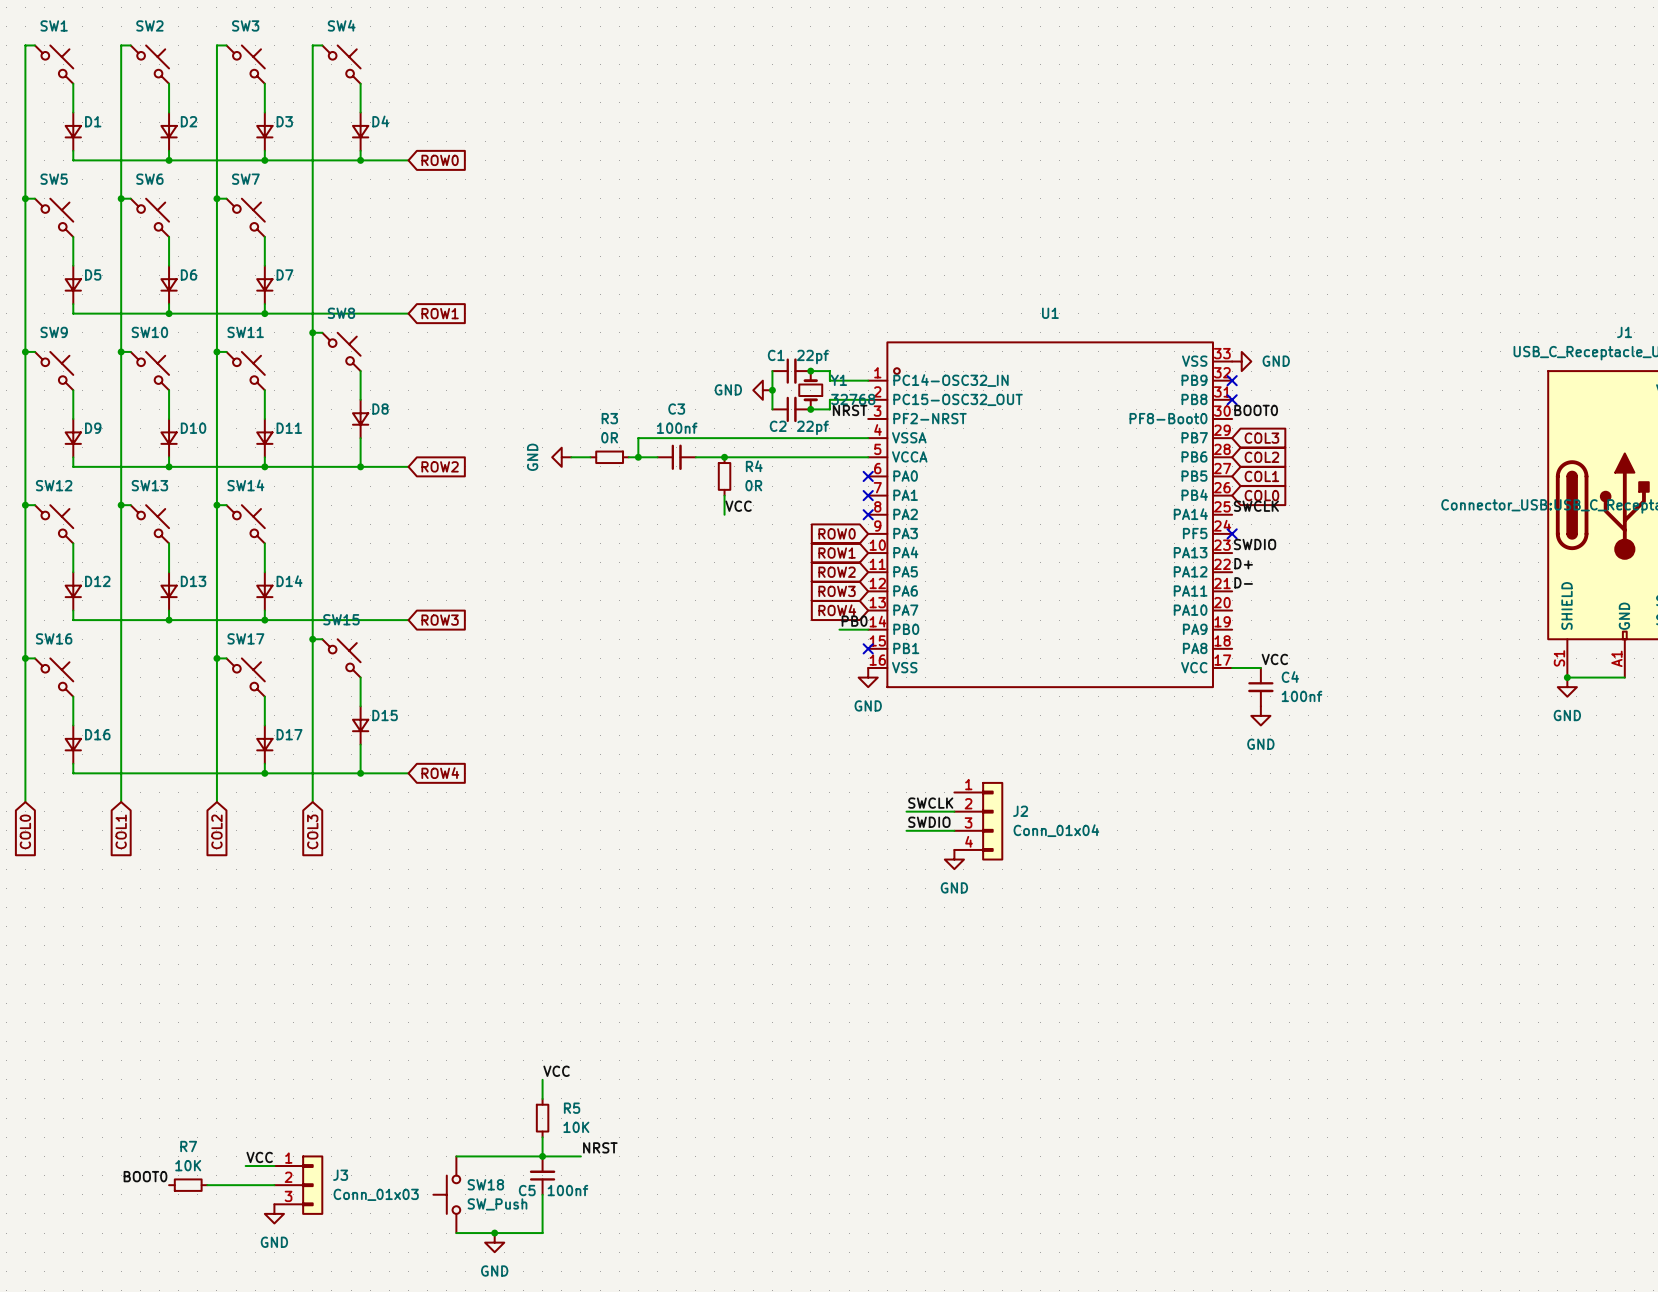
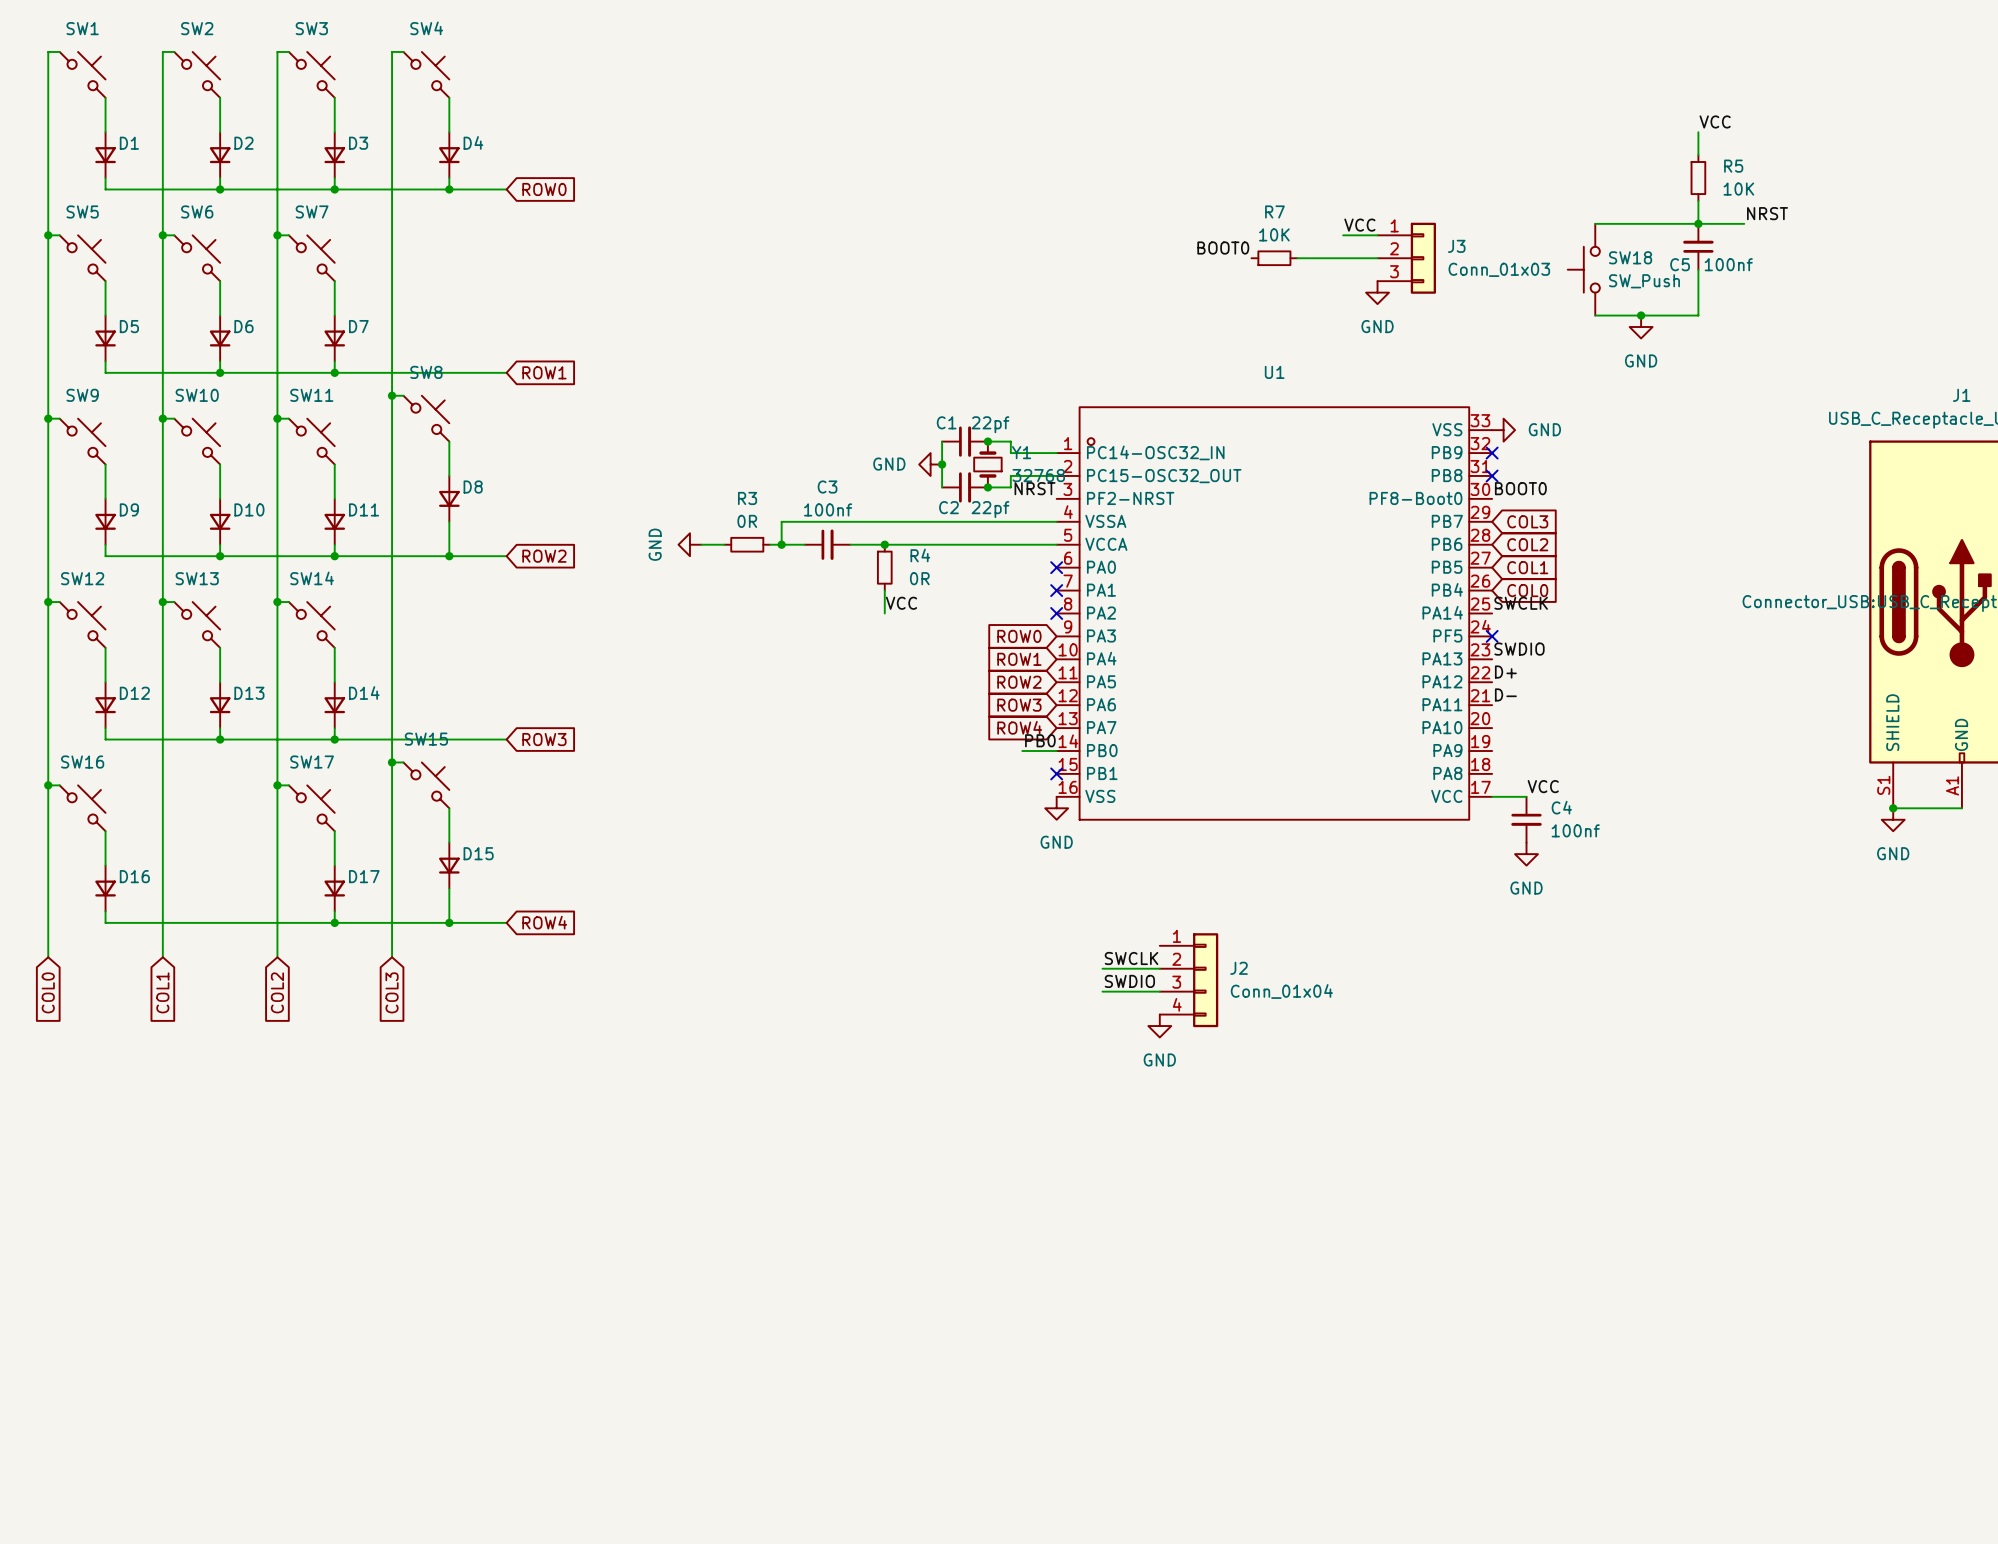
label: none -> VCC (1715, 121)
wire: none -> (1698, 132) (1698, 155)
wire: none -> (1698, 200) (1698, 223)
label: none -> NRST (1767, 213)
wire: none -> (1595, 223) (1744, 223)
junction: none -> (1698, 223)
label: none -> VCC (1359, 225)
wire: none -> (1343, 235) (1377, 235)
label: none -> BOOT0 (1223, 248)
wire: none -> (1297, 258) (1377, 258)
wire: none -> (1698, 269) (1698, 315) (1595, 315)
power symbol: none -> GND (1377, 292)
junction: none -> (1641, 315)
power symbol: none -> GND (1641, 327)
label: VCC (556, 1071) -> none
wire: (542, 1079) (542, 1098) -> none
R5 position: (542, 1118) -> (1698, 178)
wire: (542, 1137) (542, 1156) -> none
label: NRST (600, 1147) -> none
wire: (456, 1156) (580, 1156) -> none
junction: (542, 1156) -> none
label: VCC (259, 1157) -> none
wire: (245, 1166) (274, 1166) -> none
C5 position: (542, 1175) -> (1698, 246)
label: BOOT0 (145, 1176) -> none
R7 position: (188, 1185) -> (1274, 258)
wire: (207, 1185) (274, 1185) -> none
J3 position: (298, 1185) -> (1406, 258)
SW18 position: (446, 1194) -> (1583, 269)
wire: (542, 1194) (542, 1233) (456, 1233) -> none
power symbol: GND (274, 1213) -> none
junction: (494, 1233) -> none
power symbol: GND (494, 1242) -> none

